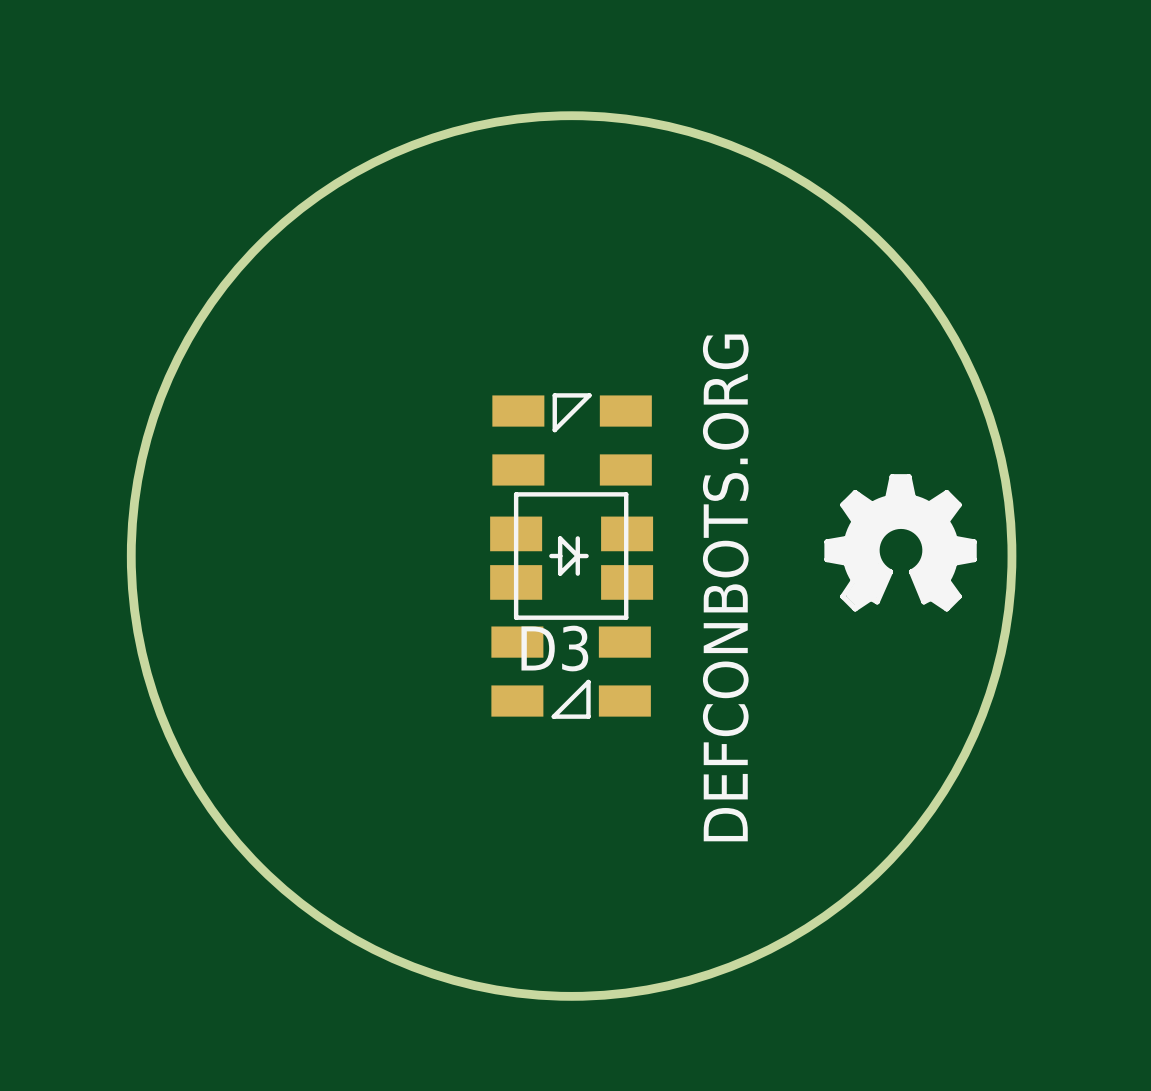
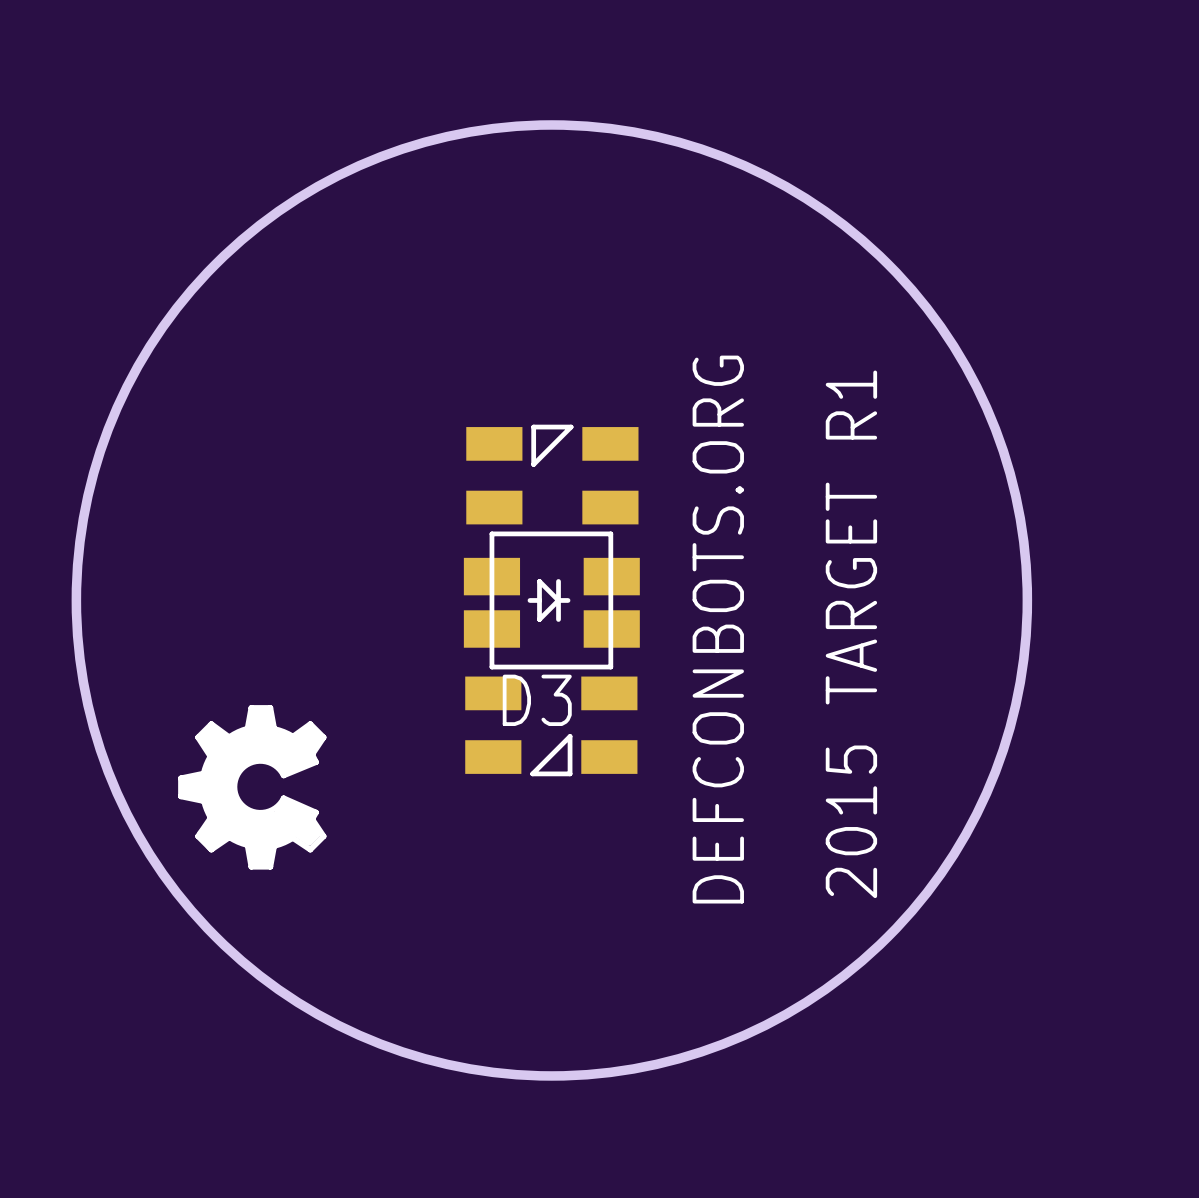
drawing: [824, 474, 977, 612] -> none
text: none -> 2015 TARGET R1 (851, 634)
drawing: none -> [178, 705, 327, 870]

